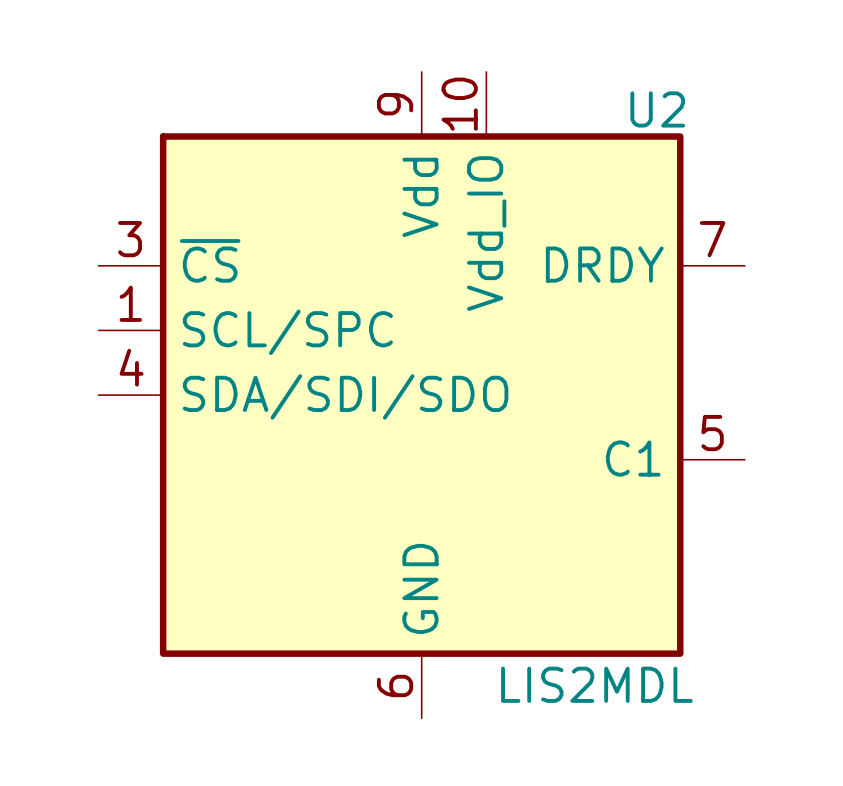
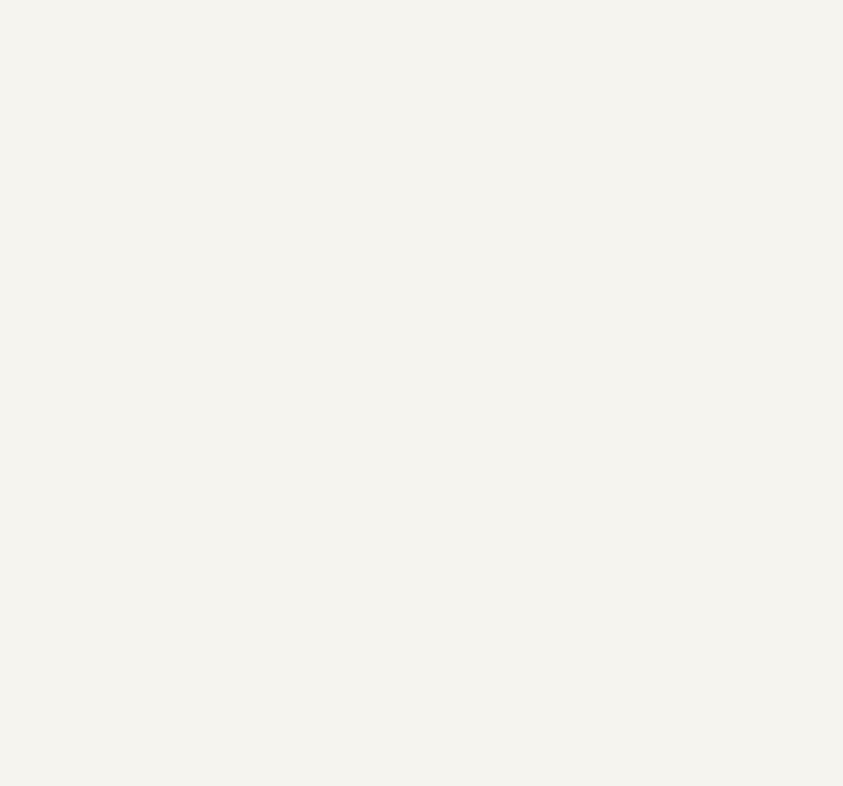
U2: LIS2MDL (421, 395) -> none

